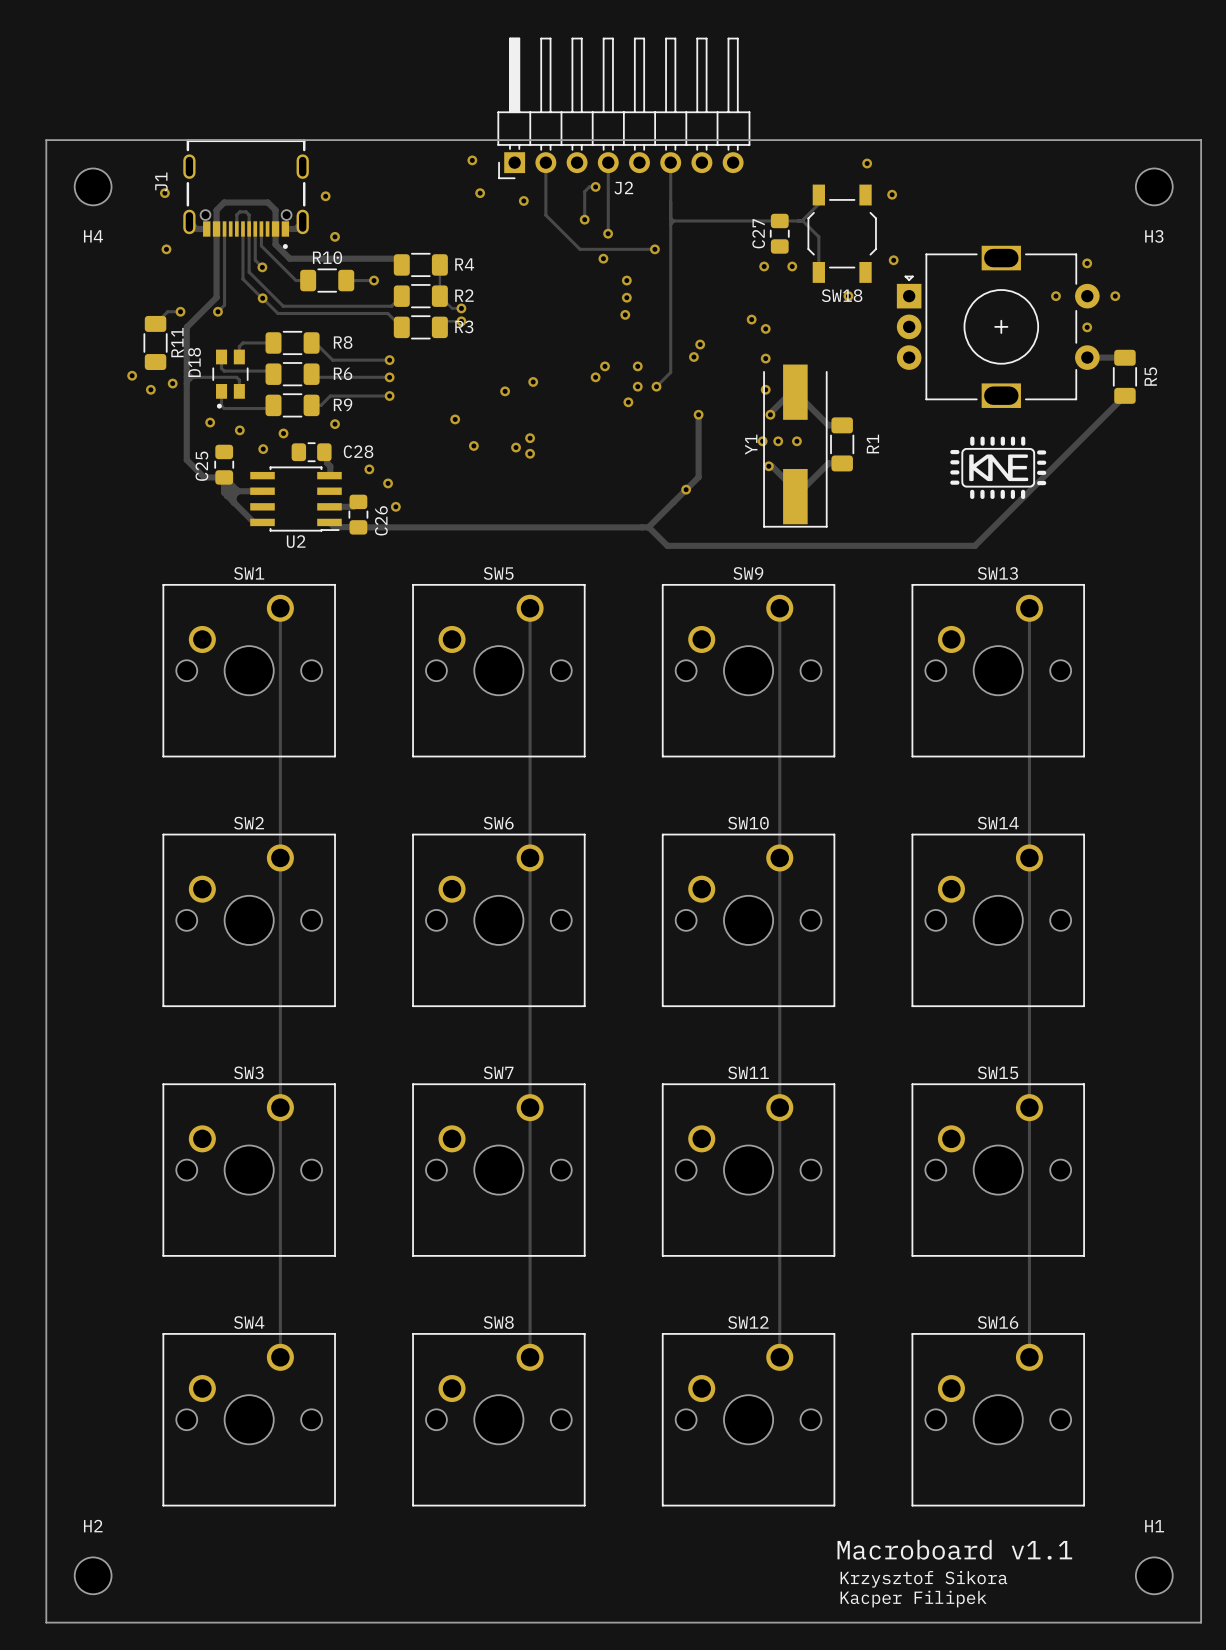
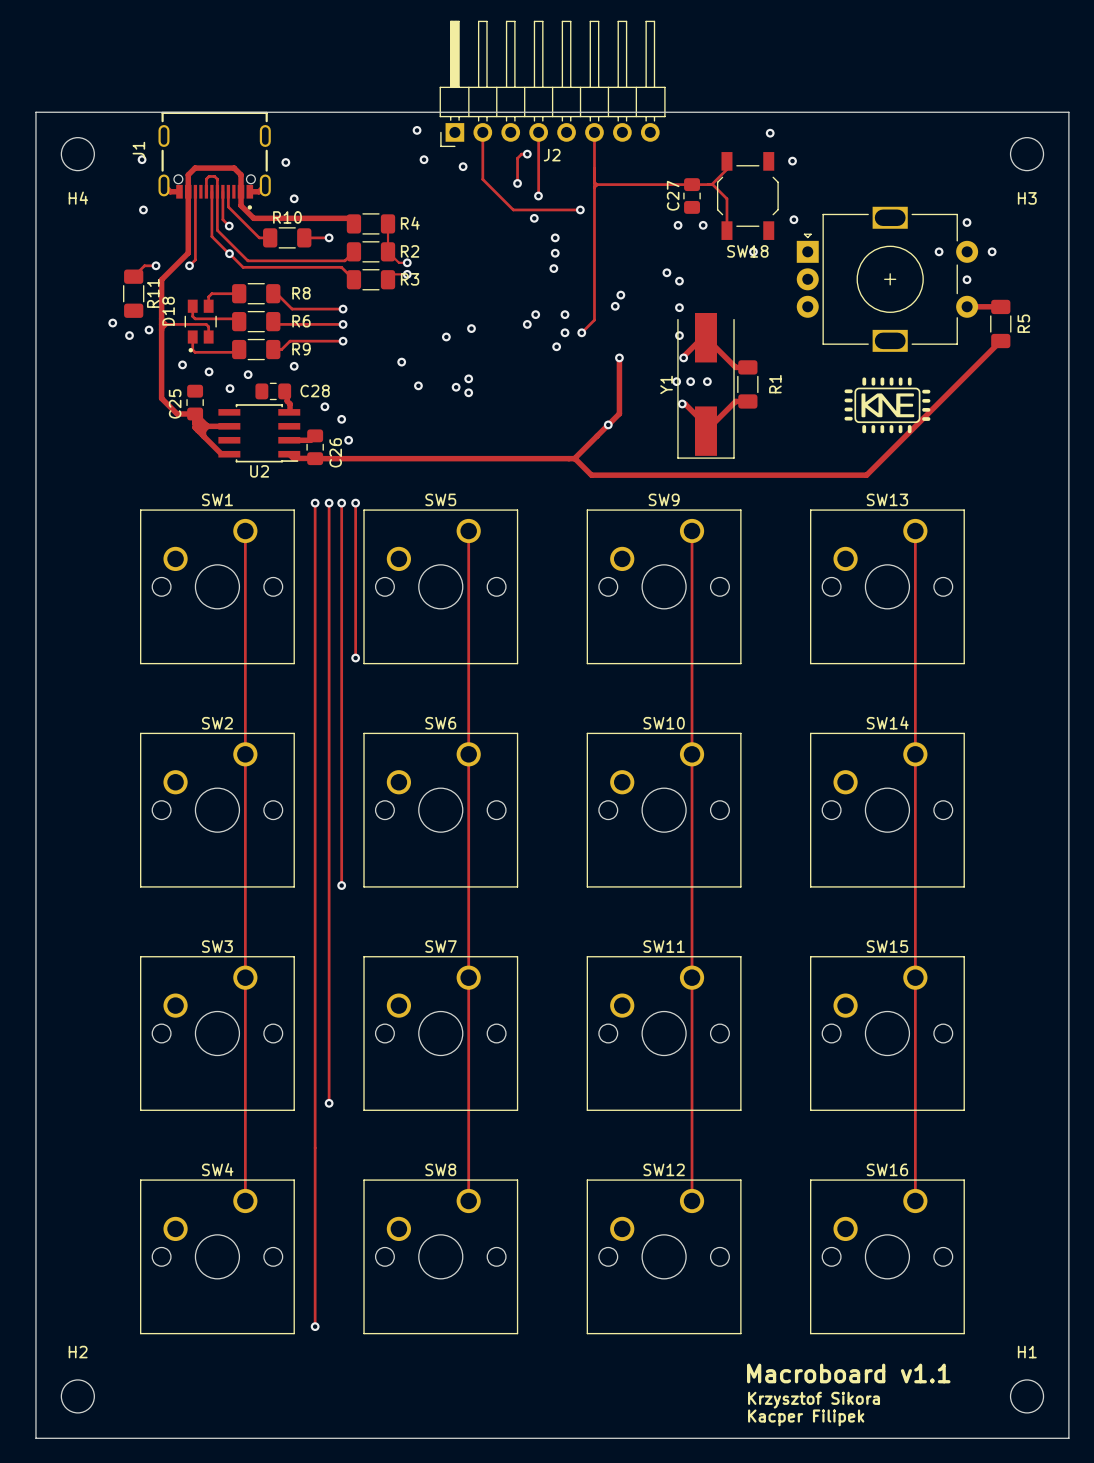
track: none -> (315, 503) (315, 1326)
via: none -> (315, 503)
track: none -> (329, 503) (329, 1103)
via: none -> (329, 503)
track: none -> (341, 503) (341, 885)
via: none -> (341, 503)
track: none -> (355, 503) (355, 658)
via: none -> (355, 503)
via: none -> (355, 658)
via: none -> (341, 885)
via: none -> (329, 1103)
via: none -> (315, 1326)

